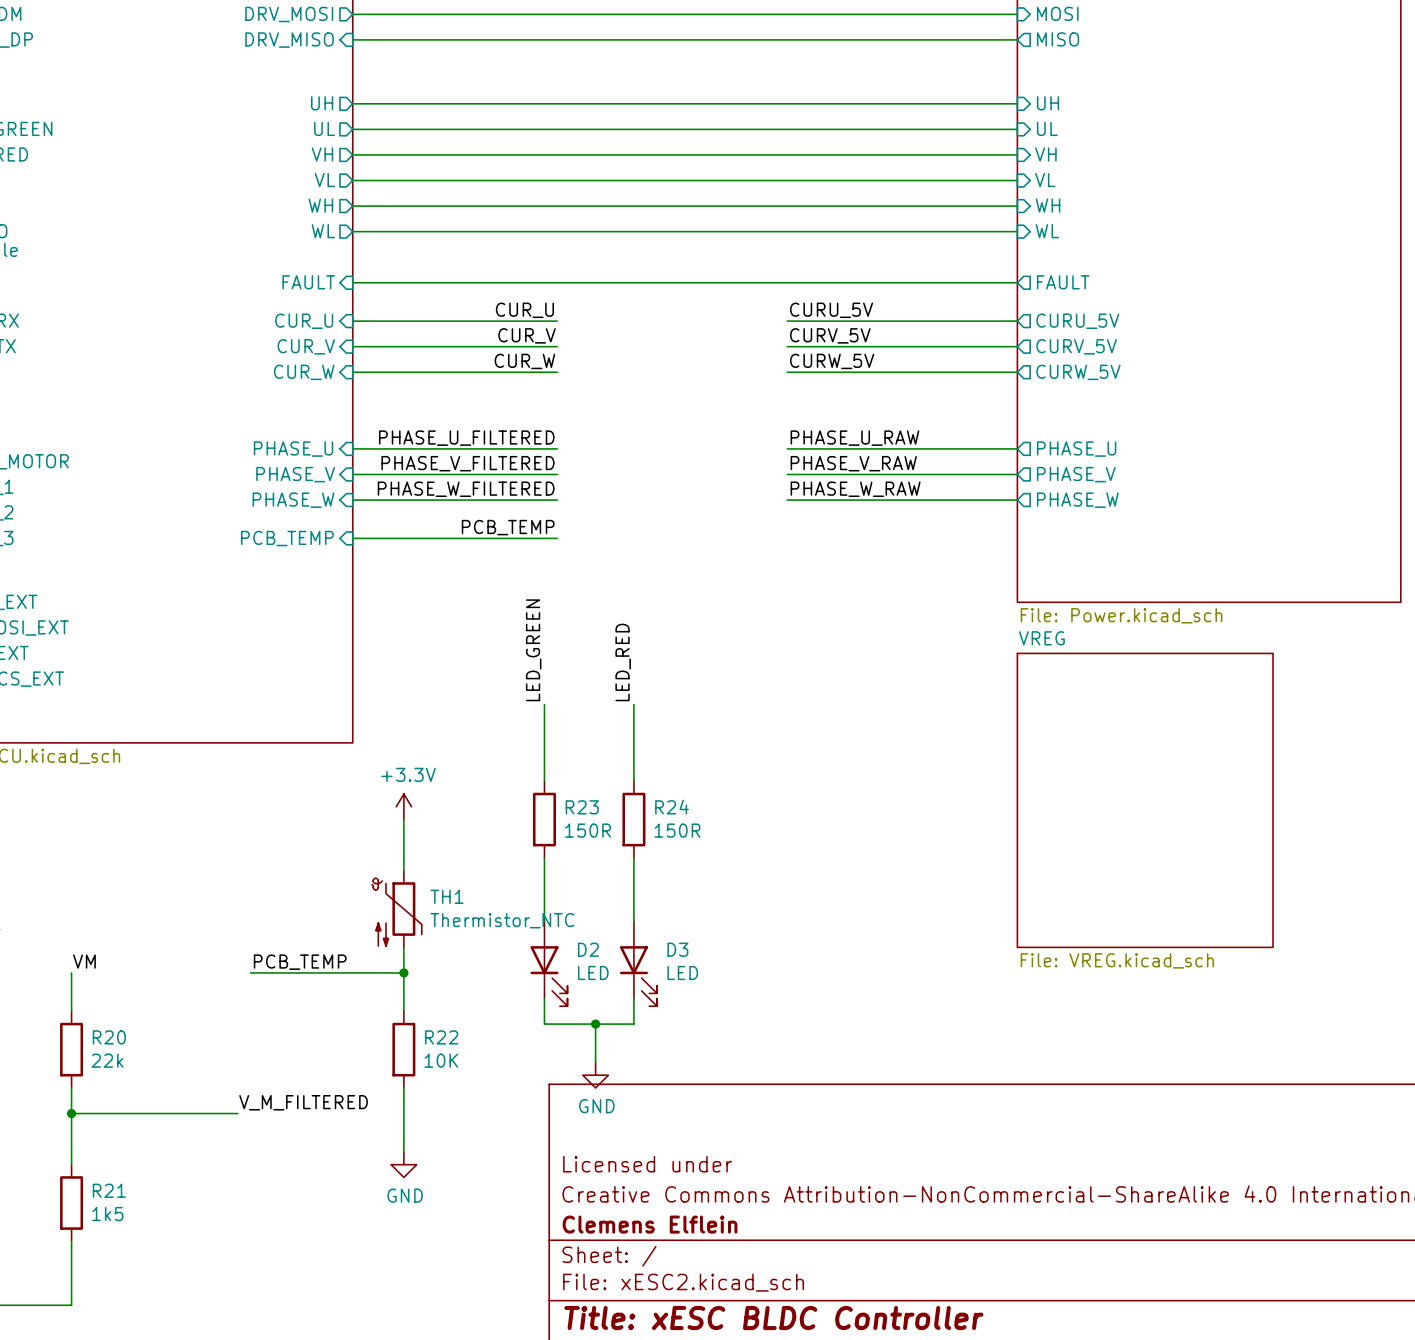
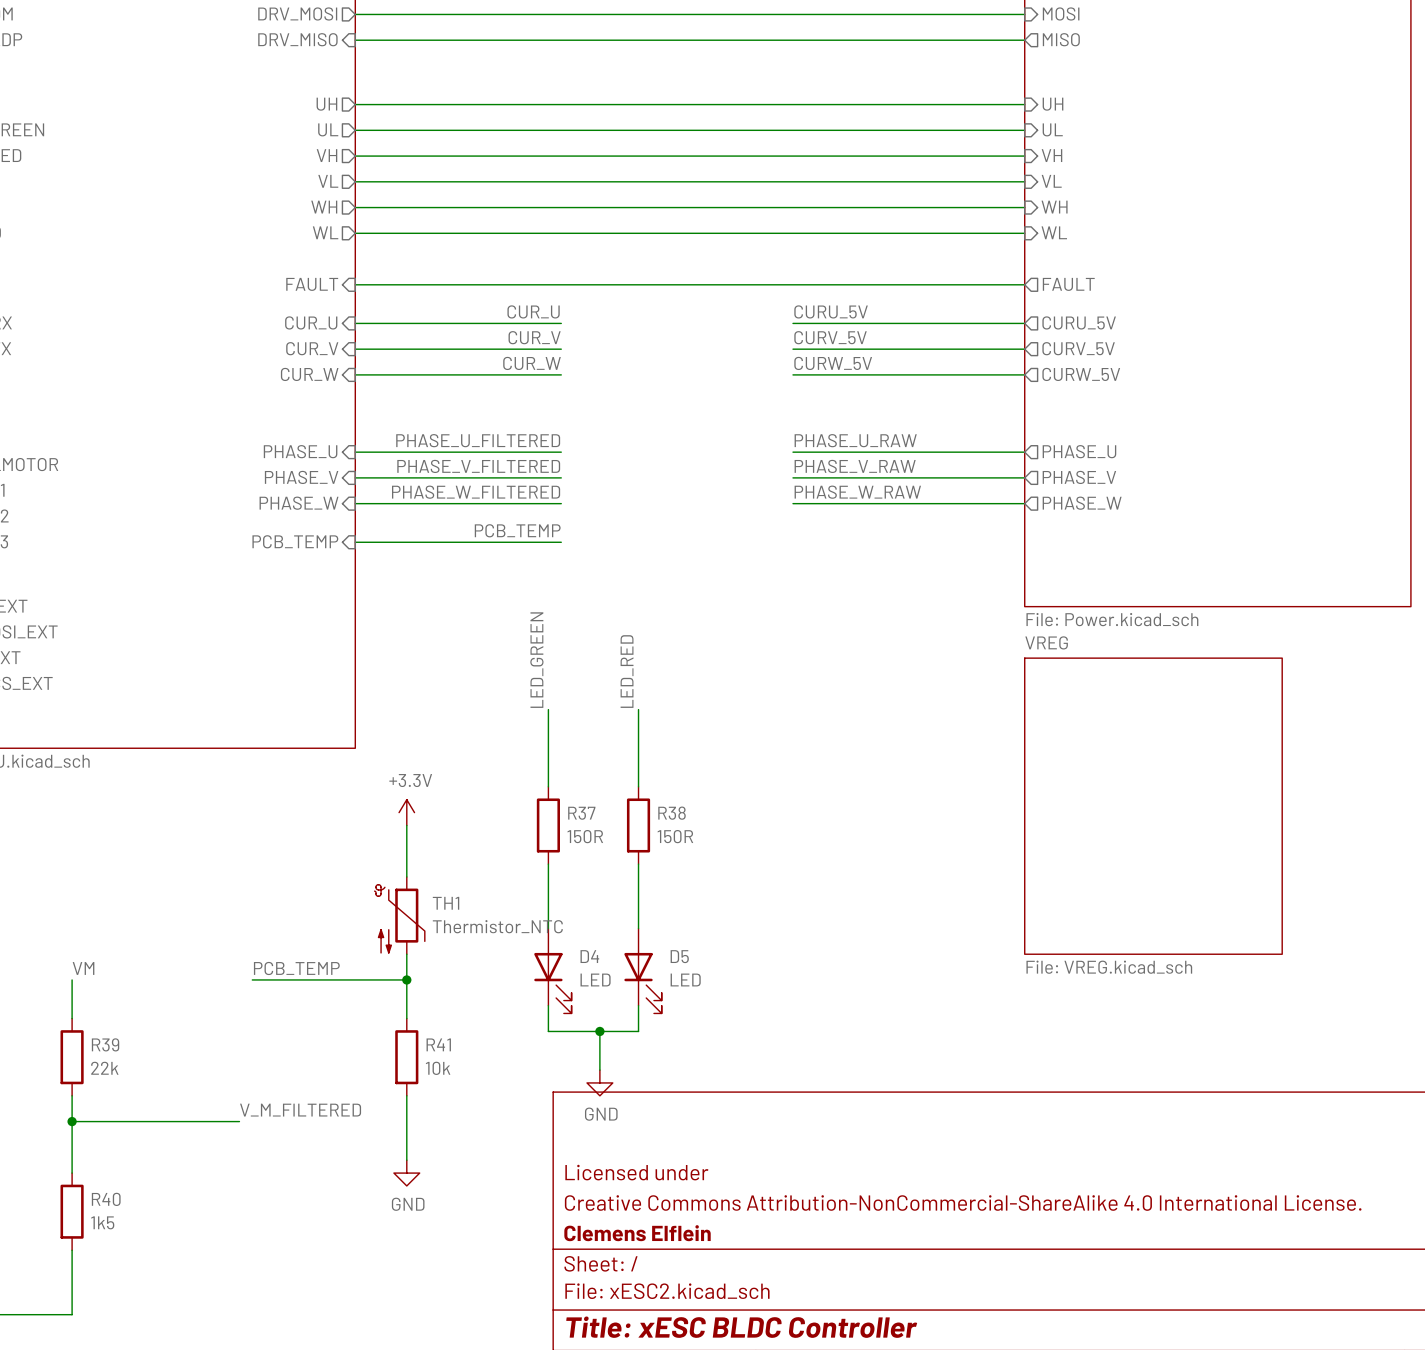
R23 name: R23 (582, 807) -> R37 (581, 813)
R24 name: R24 (672, 807) -> R38 (672, 813)
D2 name: D2 (588, 949) -> D4 (589, 956)
D3 name: D3 (677, 949) -> D5 (679, 956)
R20 name: R20 (109, 1037) -> R39 (105, 1044)
R22 name: R22 (441, 1037) -> R41 (438, 1044)
R22 value: 10K (441, 1060) -> 10k (438, 1068)
R21 name: R21 (109, 1190) -> R40 (106, 1199)

